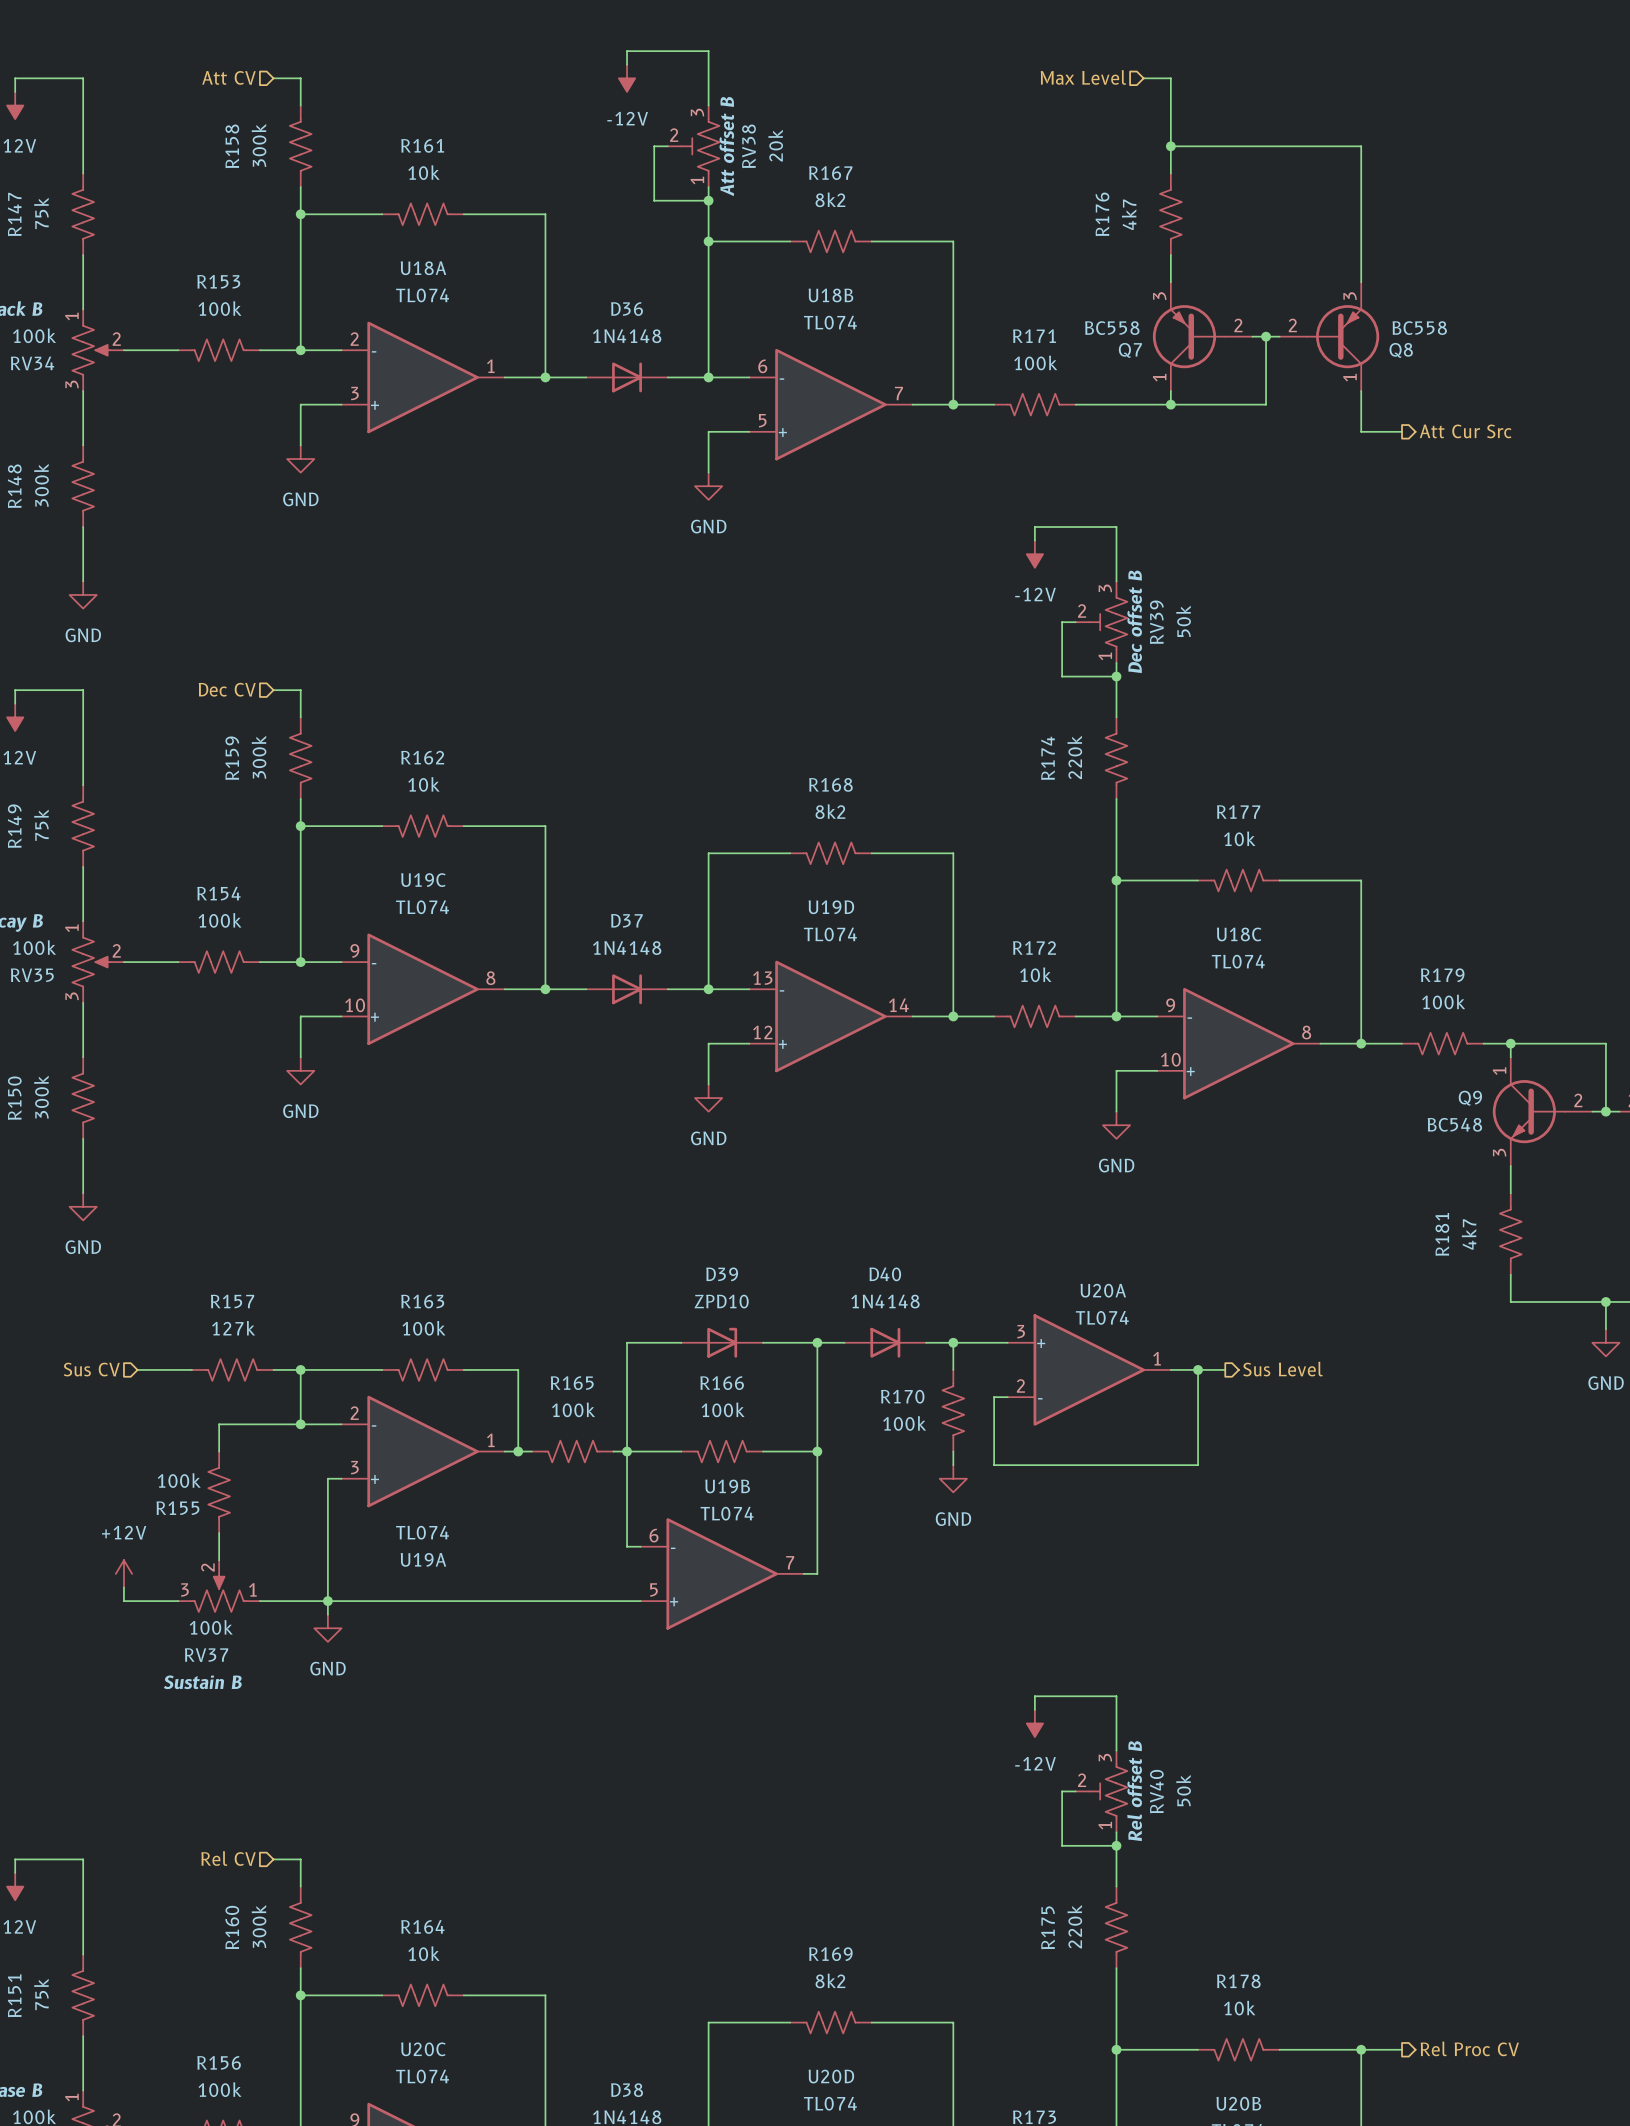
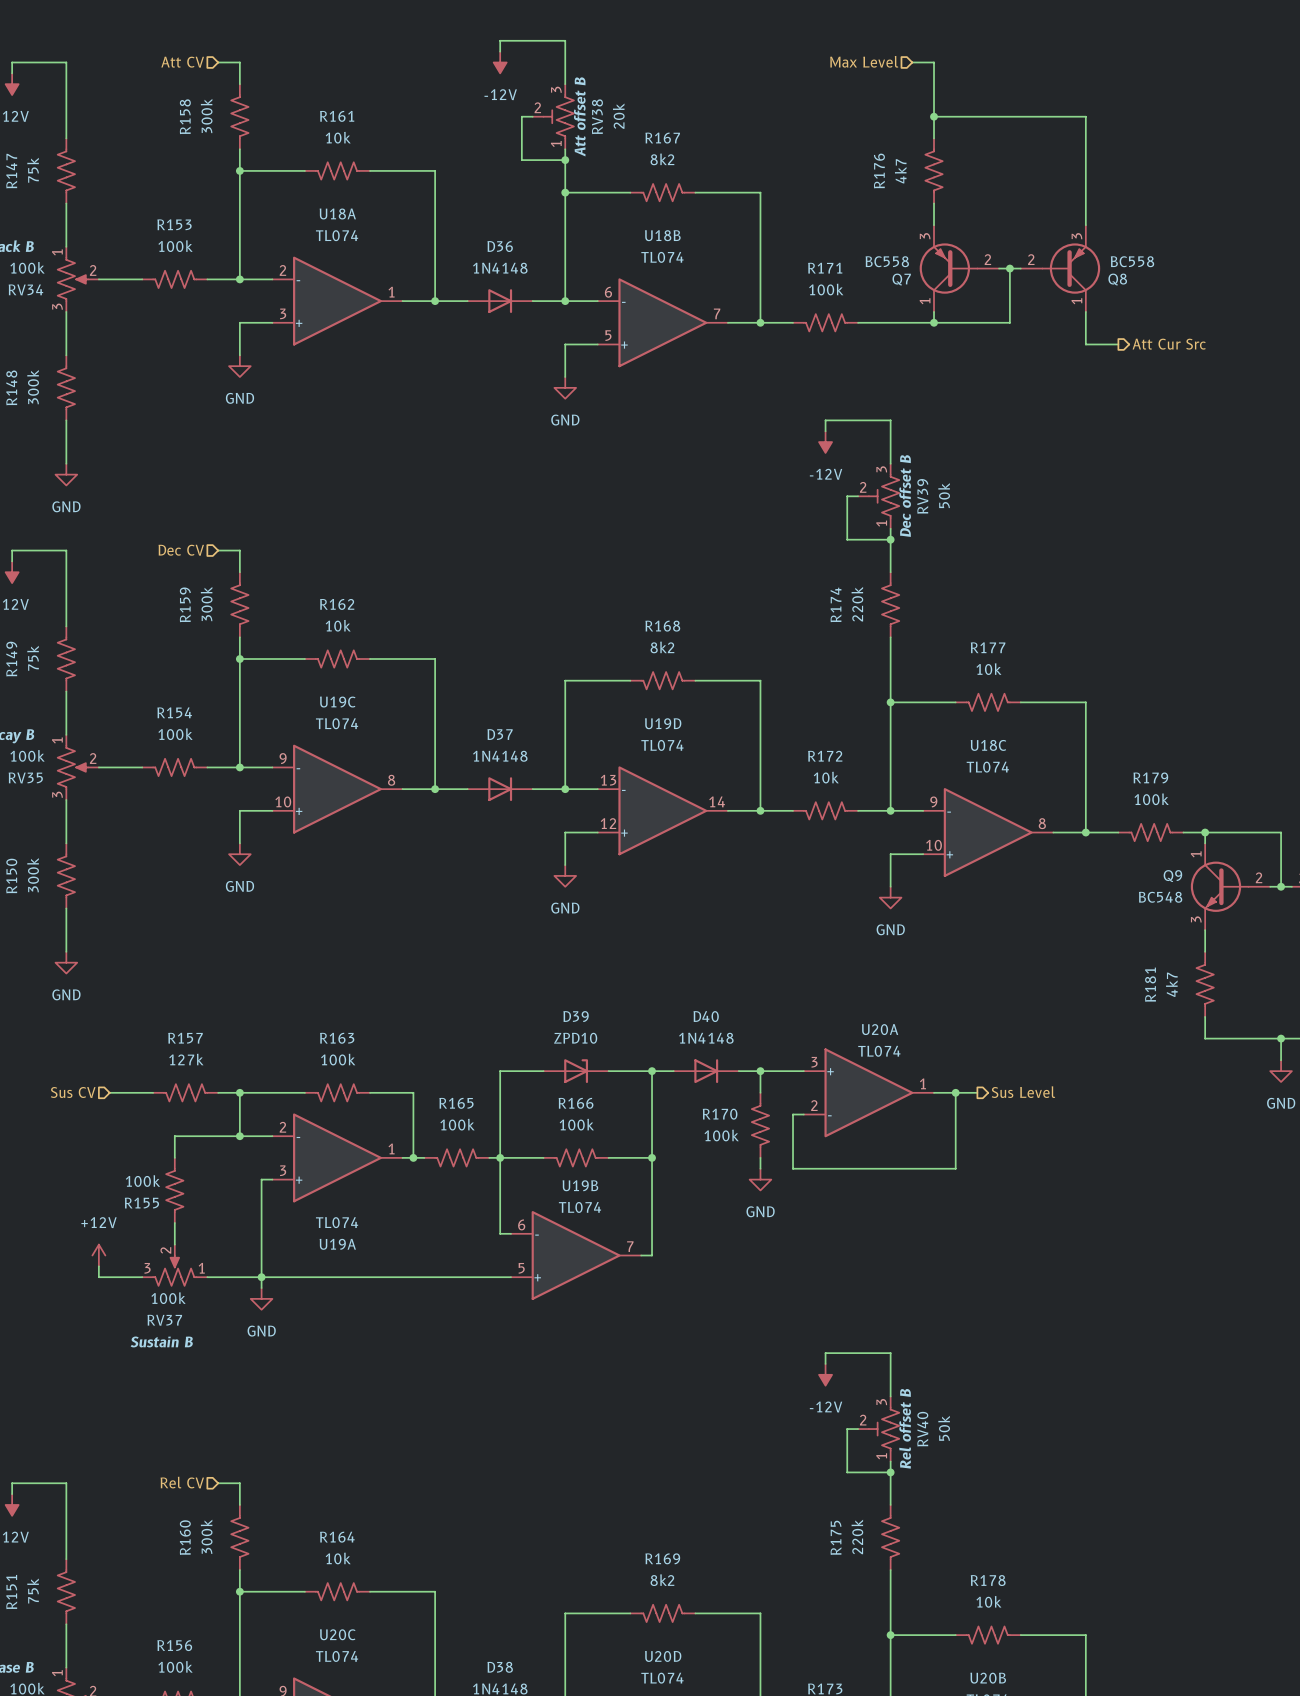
hierarchical label: Rel Proc CV (1469, 2048) -> none
wire: (1361, 2049) (1402, 2049) -> none
junction: (1361, 2049) -> none

